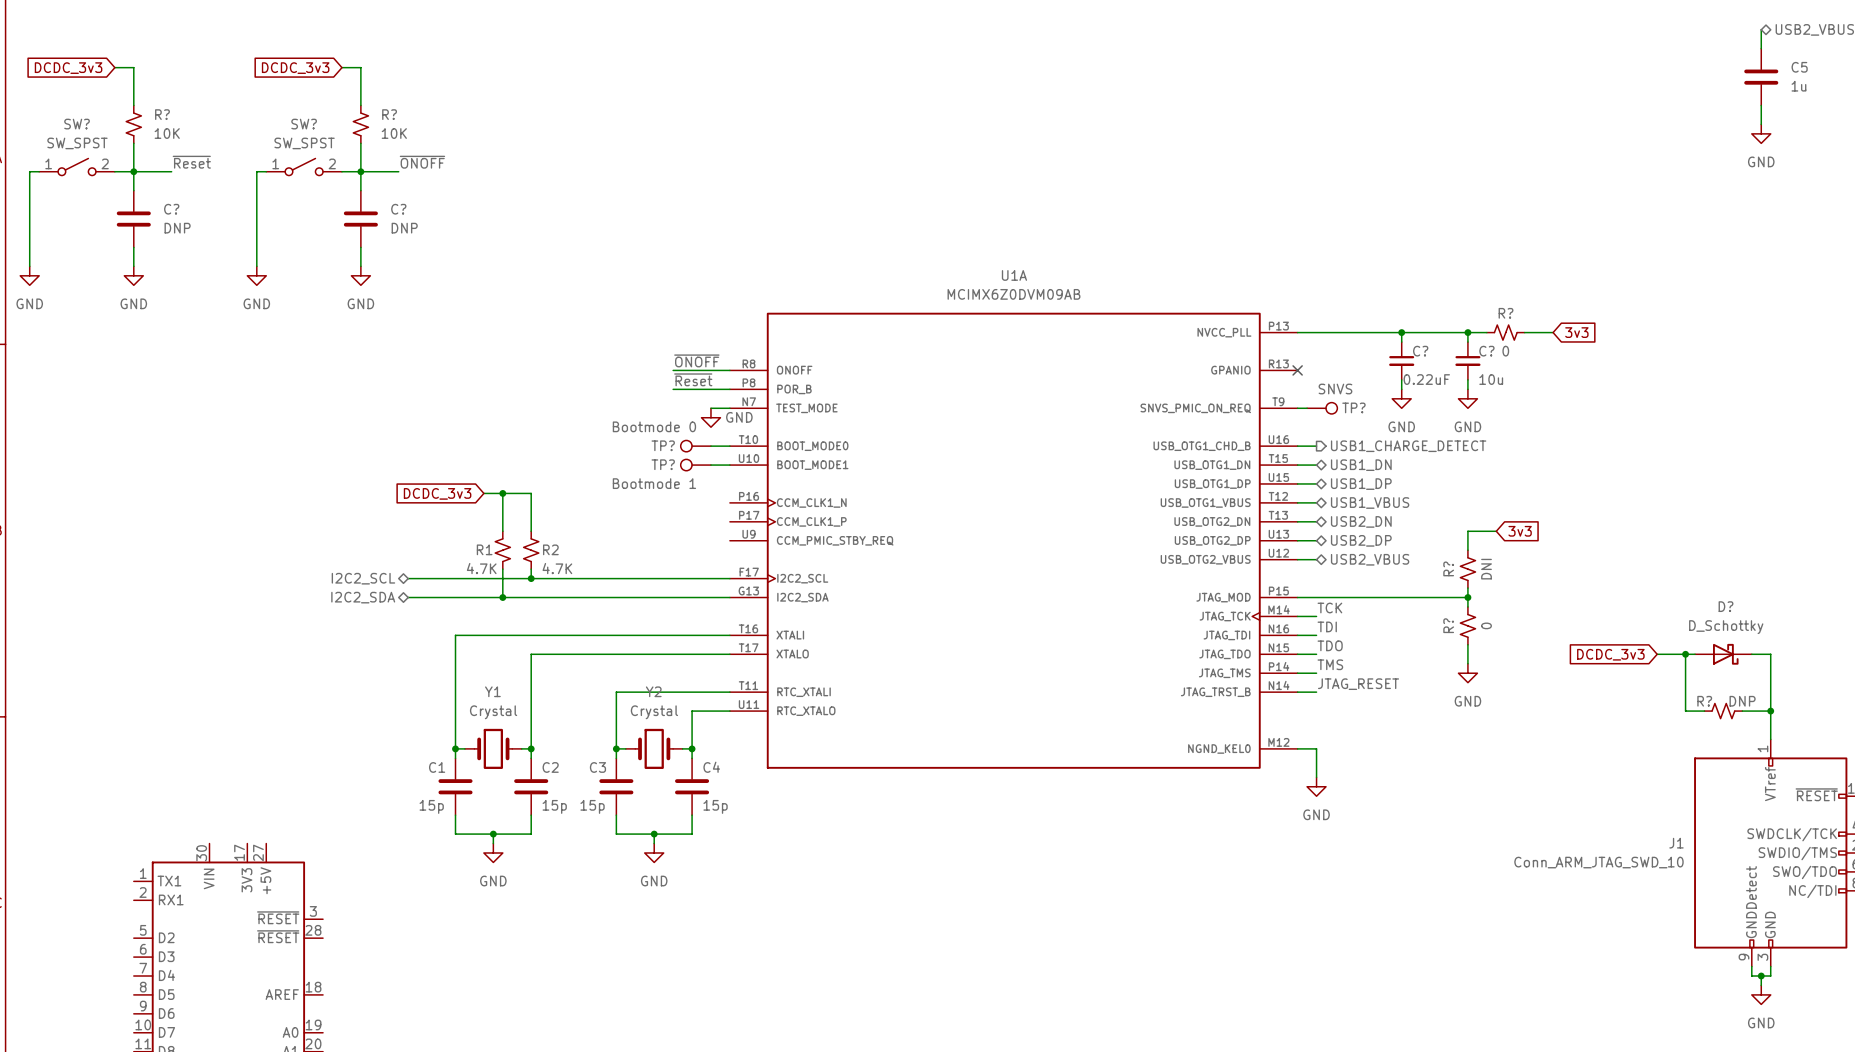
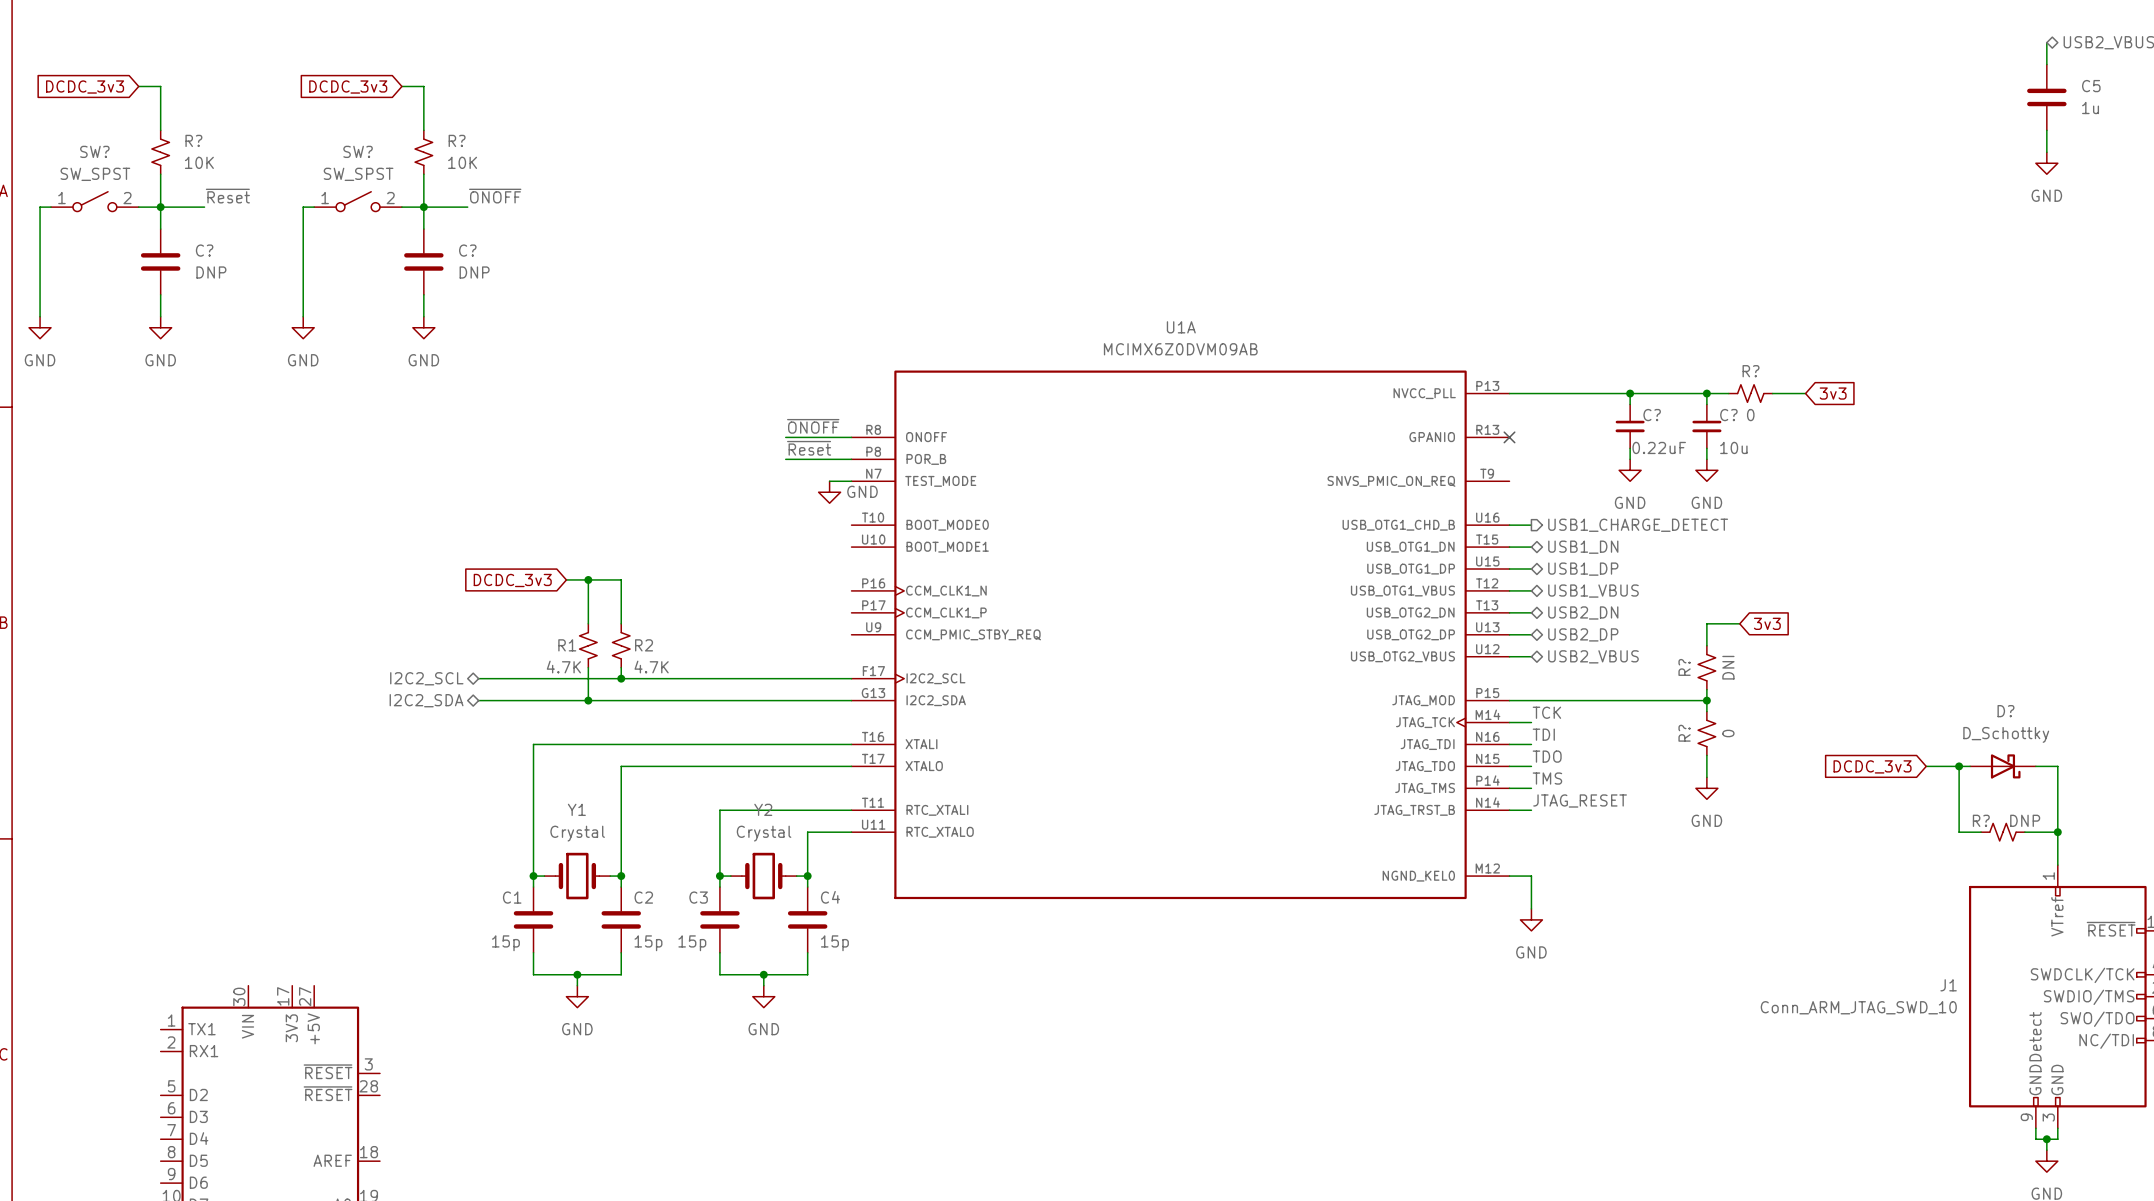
wire: (1297, 408) (1307, 408) -> none
TP?: SNVS (1322, 408) -> none
TP?: Bootmode 0 (695, 446) -> none
wire: (710, 446) (729, 446) -> none
TP?: Bootmode 1 (695, 465) -> none
wire: (710, 465) (729, 465) -> none

